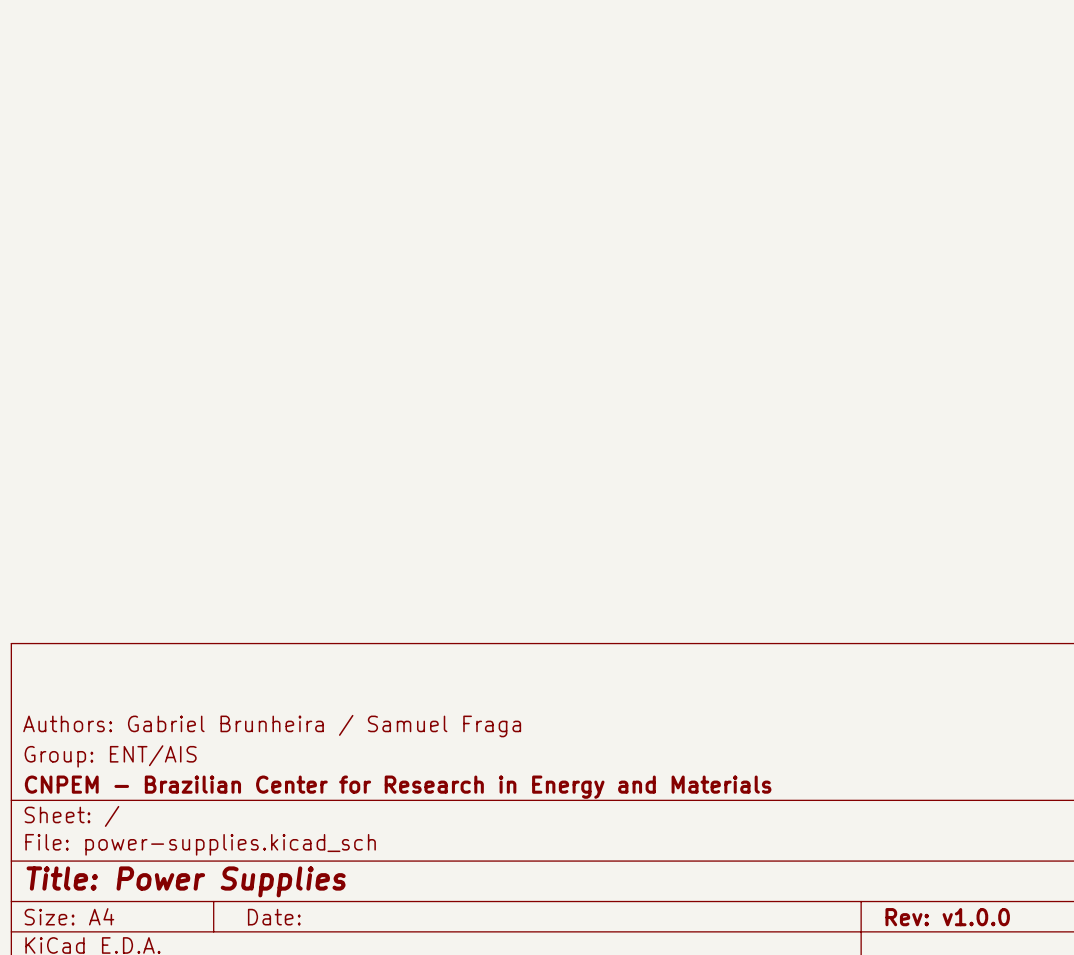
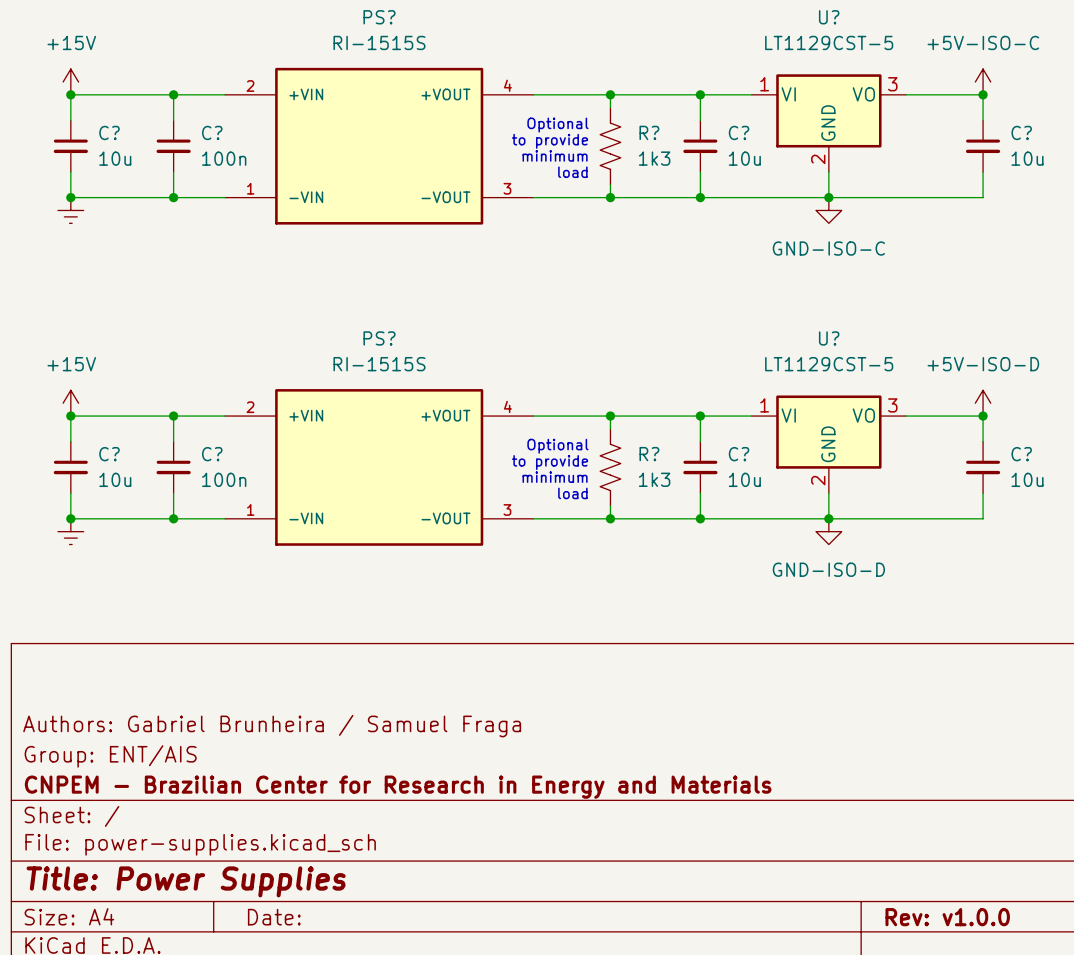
power symbol: none -> +15V (70, 81)
power symbol: none -> +5V-ISO-C (983, 81)
junction: none -> (70, 94)
wire: none -> (173, 94) (173, 120)
junction: none -> (173, 94)
wire: none -> (225, 94) (70, 94) (70, 120)
wire: none -> (533, 94) (751, 94)
wire: none -> (610, 94) (610, 107)
junction: none -> (610, 94)
wire: none -> (700, 94) (700, 120)
junction: none -> (700, 94)
wire: none -> (905, 94) (983, 94) (983, 120)
junction: none -> (983, 94)
U?: none -> LT1129CST-5 (828, 123)
text: none -> Optional (557, 125)
text: none -> to provide (550, 141)
C?: none -> 10u (70, 146)
C?: none -> 100n (173, 146)
PS?: none -> RI-1515S (379, 146)
R?: none -> 1k3 (610, 146)
C?: none -> 10u (700, 146)
C?: none -> 10u (983, 146)
text: none -> minimum (555, 155)
wire: none -> (70, 171) (70, 197) (225, 197)
wire: none -> (173, 171) (173, 197)
wire: none -> (700, 171) (700, 197)
wire: none -> (828, 171) (828, 197)
wire: none -> (983, 171) (983, 197) (533, 197)
text: none -> load (572, 172)
wire: none -> (610, 184) (610, 197)
junction: none -> (70, 197)
junction: none -> (173, 197)
junction: none -> (610, 197)
junction: none -> (700, 197)
junction: none -> (828, 197)
power symbol: none -> (70, 210)
power symbol: none -> GND-ISO-C (828, 210)
power symbol: none -> +15V (70, 403)
power symbol: none -> +5V-ISO-D (983, 403)
junction: none -> (70, 416)
wire: none -> (173, 416) (173, 441)
junction: none -> (173, 416)
wire: none -> (225, 416) (70, 416) (70, 441)
wire: none -> (533, 416) (751, 416)
wire: none -> (610, 416) (610, 428)
junction: none -> (610, 416)
wire: none -> (700, 416) (700, 441)
junction: none -> (700, 416)
wire: none -> (905, 416) (983, 416) (983, 441)
junction: none -> (983, 416)
U?: none -> LT1129CST-5 (828, 444)
text: none -> Optional (557, 446)
text: none -> to provide (550, 462)
C?: none -> 10u (70, 467)
C?: none -> 100n (173, 467)
PS?: none -> RI-1515S (379, 467)
R?: none -> 1k3 (610, 467)
C?: none -> 10u (700, 467)
C?: none -> 10u (983, 467)
text: none -> minimum (555, 477)
wire: none -> (70, 493) (70, 518) (225, 518)
wire: none -> (173, 493) (173, 518)
text: none -> load (572, 493)
wire: none -> (700, 493) (700, 518)
wire: none -> (828, 493) (828, 518)
wire: none -> (983, 493) (983, 518) (533, 518)
wire: none -> (610, 505) (610, 518)
junction: none -> (70, 518)
junction: none -> (173, 518)
junction: none -> (610, 518)
junction: none -> (700, 518)
junction: none -> (828, 518)
power symbol: none -> (70, 531)
power symbol: none -> GND-ISO-D (828, 531)

